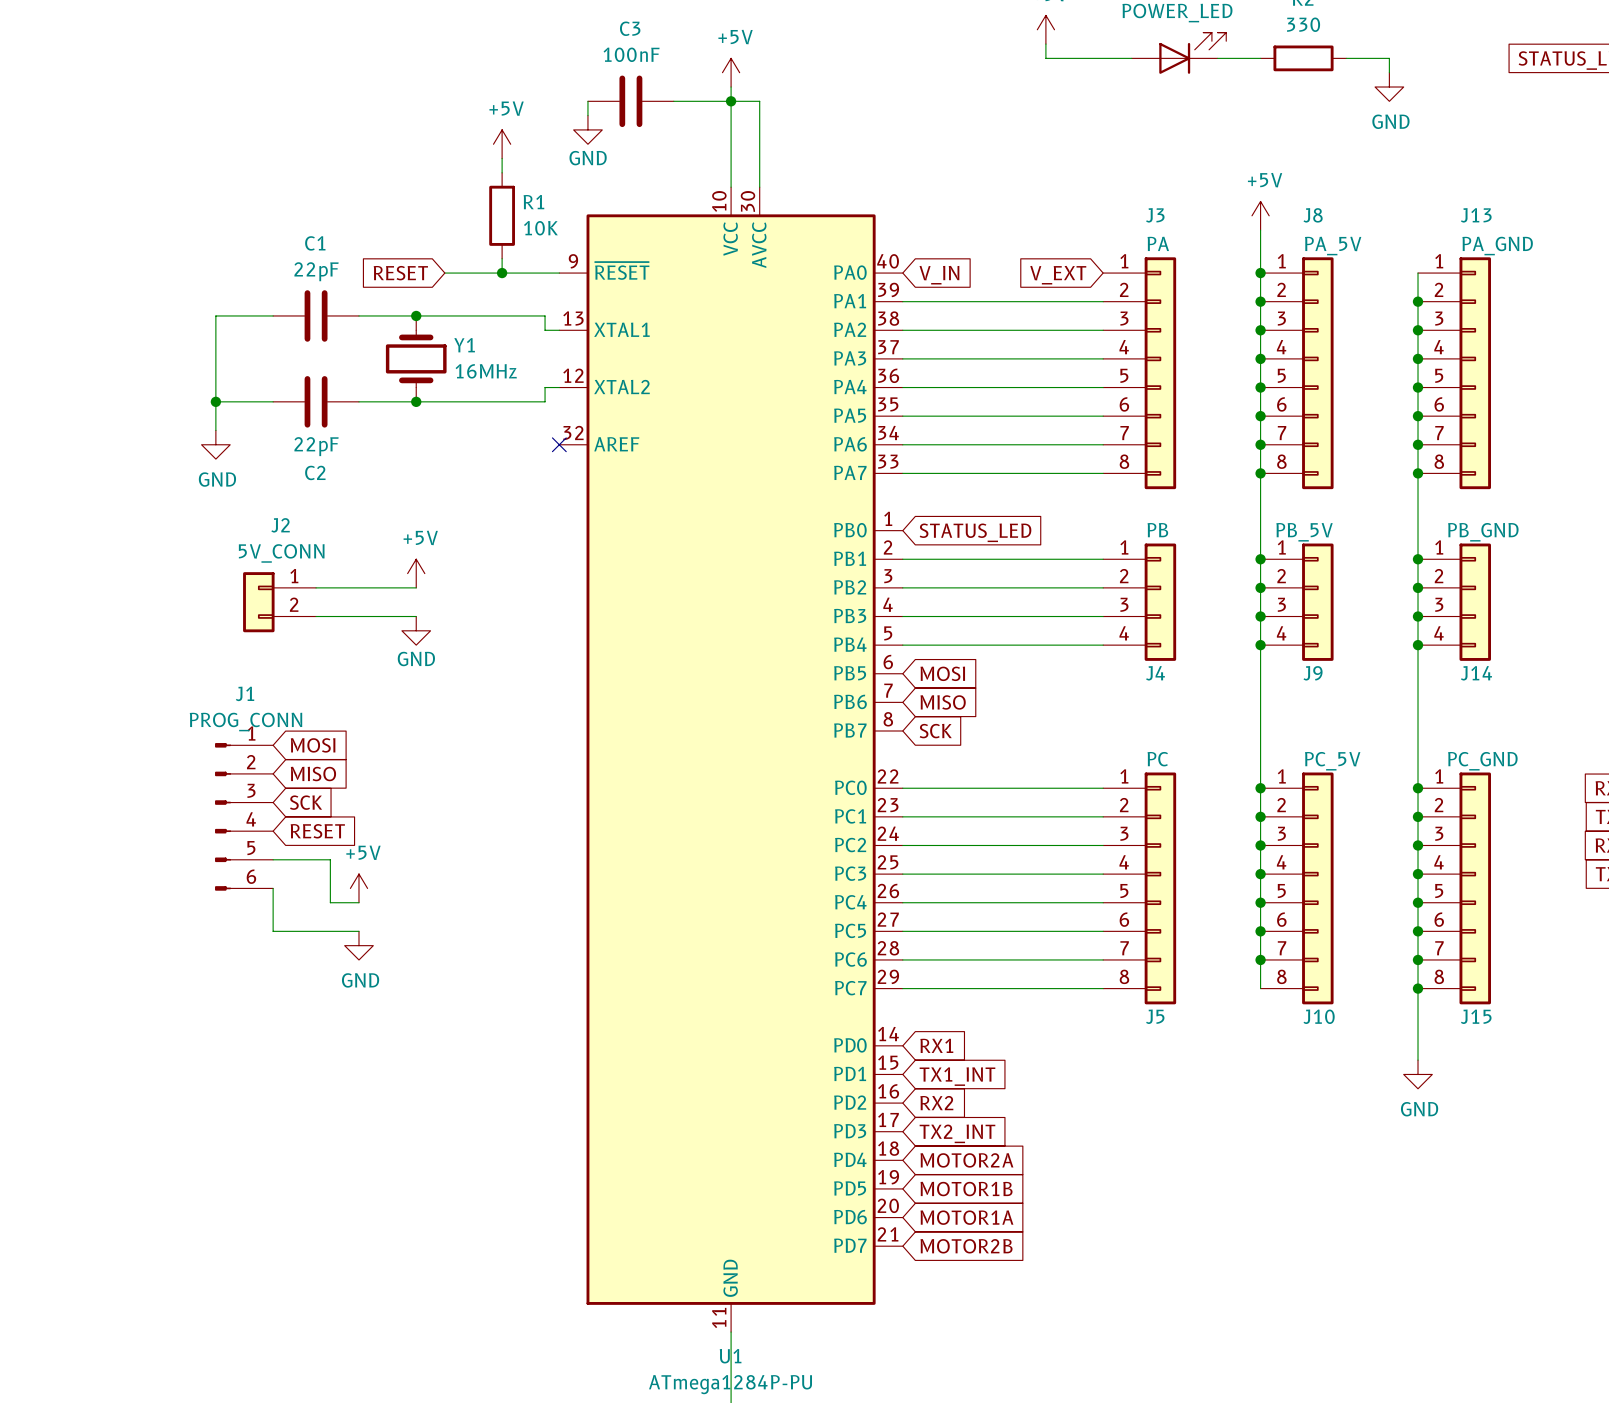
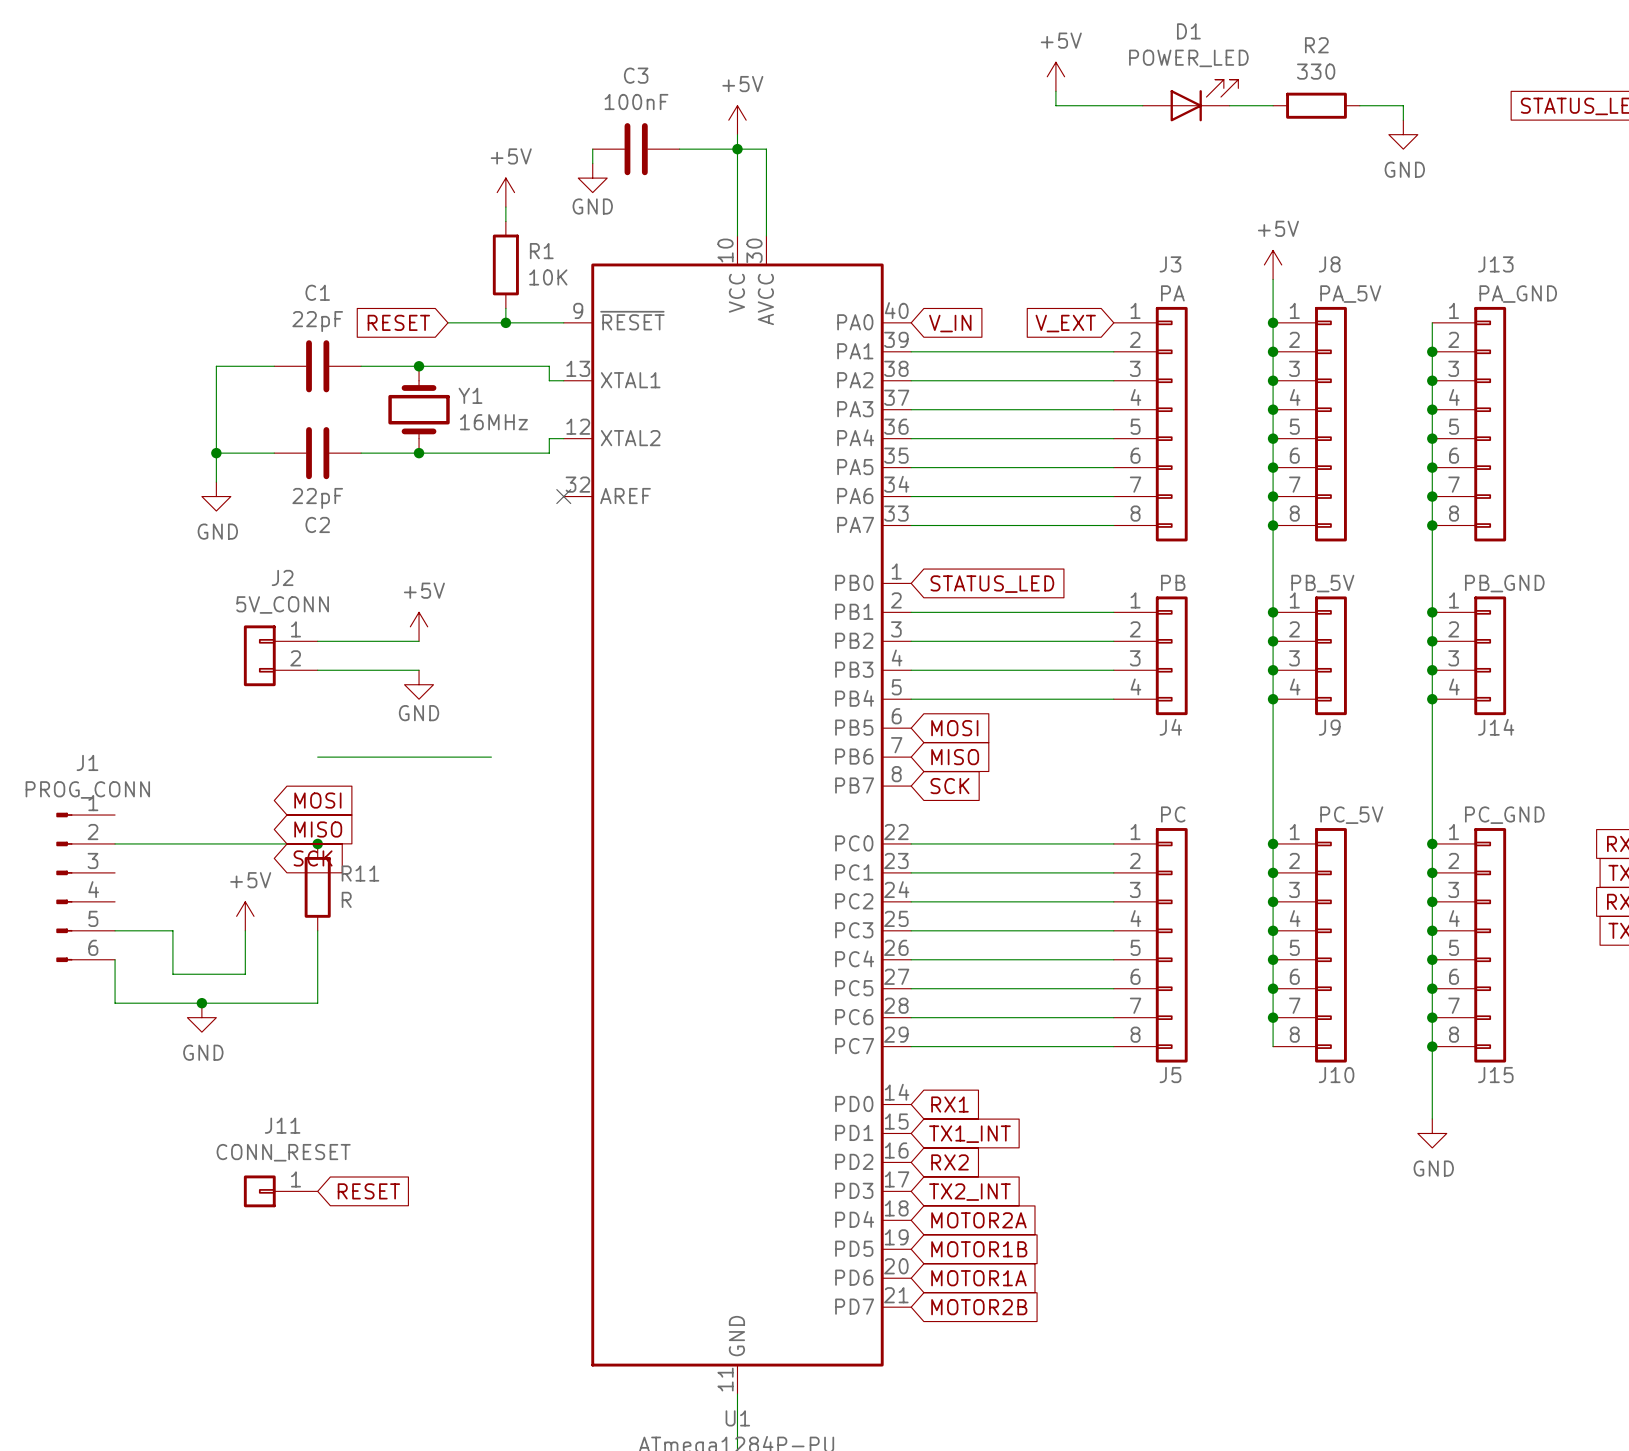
wire: none -> (317, 757) (491, 757)
wire: none -> (115, 843) (317, 843)
junction: none -> (317, 843)
J1 position: (244, 816) -> (85, 887)
R11: none -> R (317, 887)
global label: RESET (317, 831) -> none
wire: (273, 859) (330, 859) (330, 902) (358, 902) -> none
wire: none -> (115, 930) (172, 930) (172, 974) (245, 974) (245, 930)
wire: none -> (317, 930) (317, 1003) (115, 1003) (115, 959)
wire: (273, 888) (273, 931) (358, 931) -> none
power symbol position: +5V (358, 888) -> +5V (245, 916)
junction: none -> (201, 1003)
power symbol position: GND (358, 945) -> GND (201, 1017)
J11: none -> CONN_RESET (280, 1191)
global label: none -> RESET (368, 1191)

